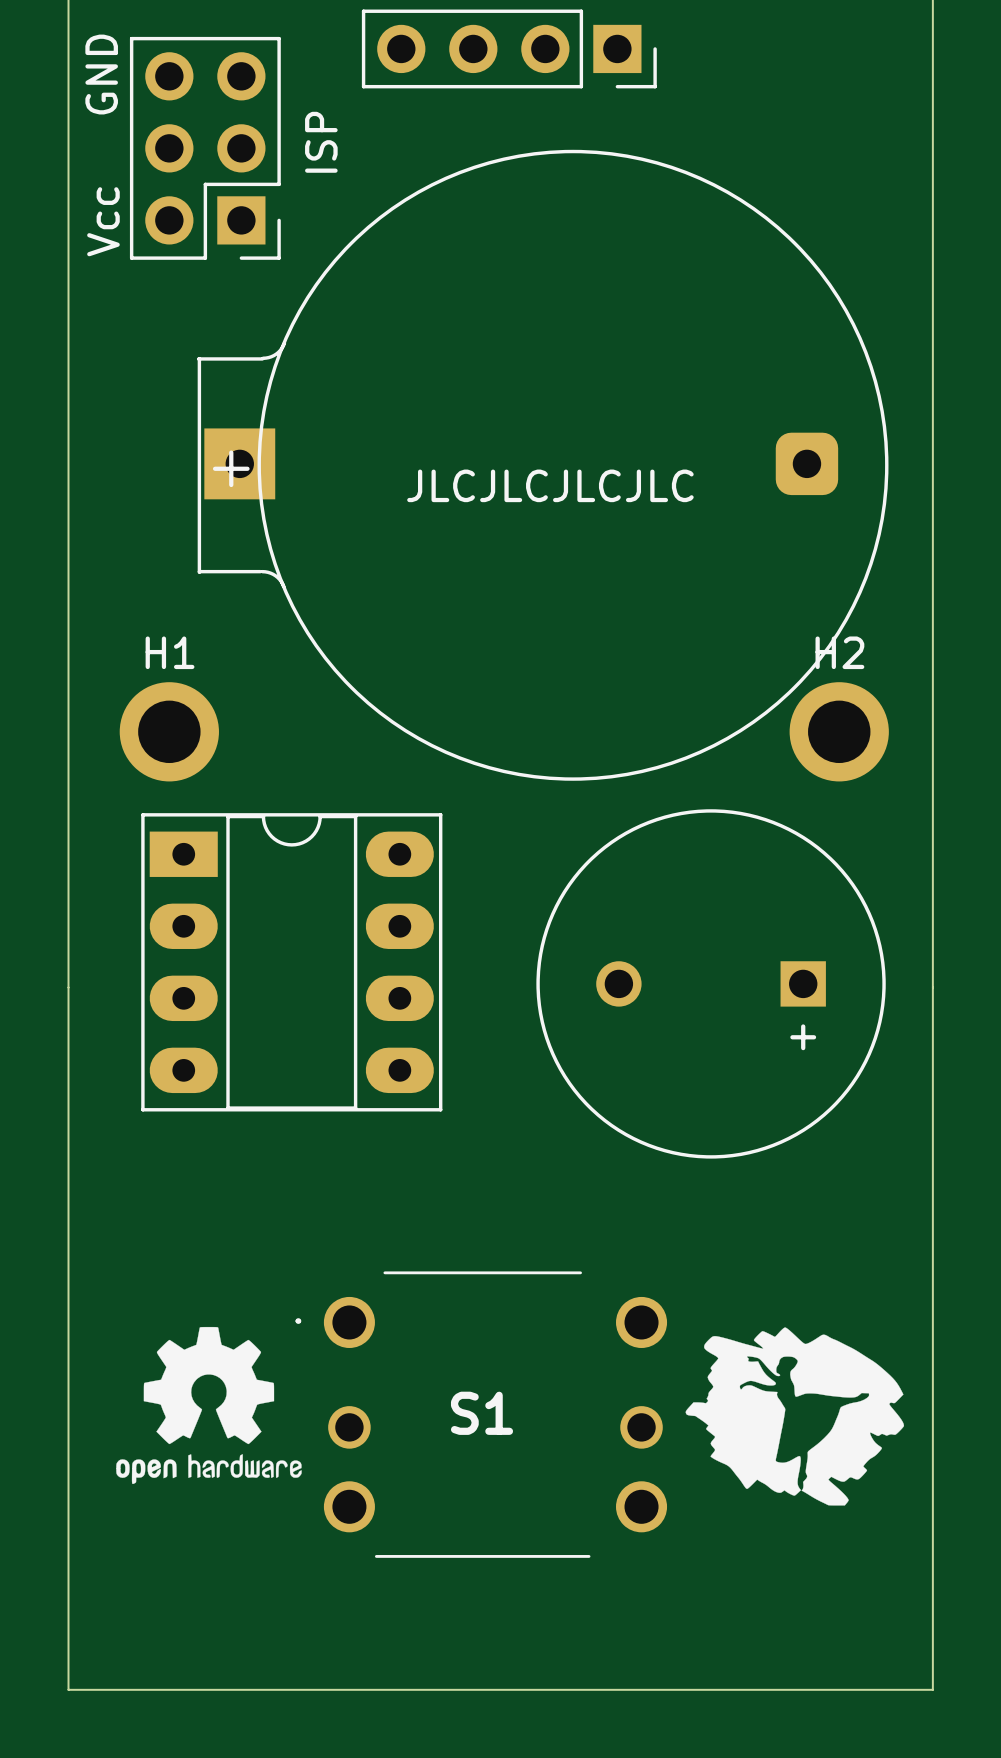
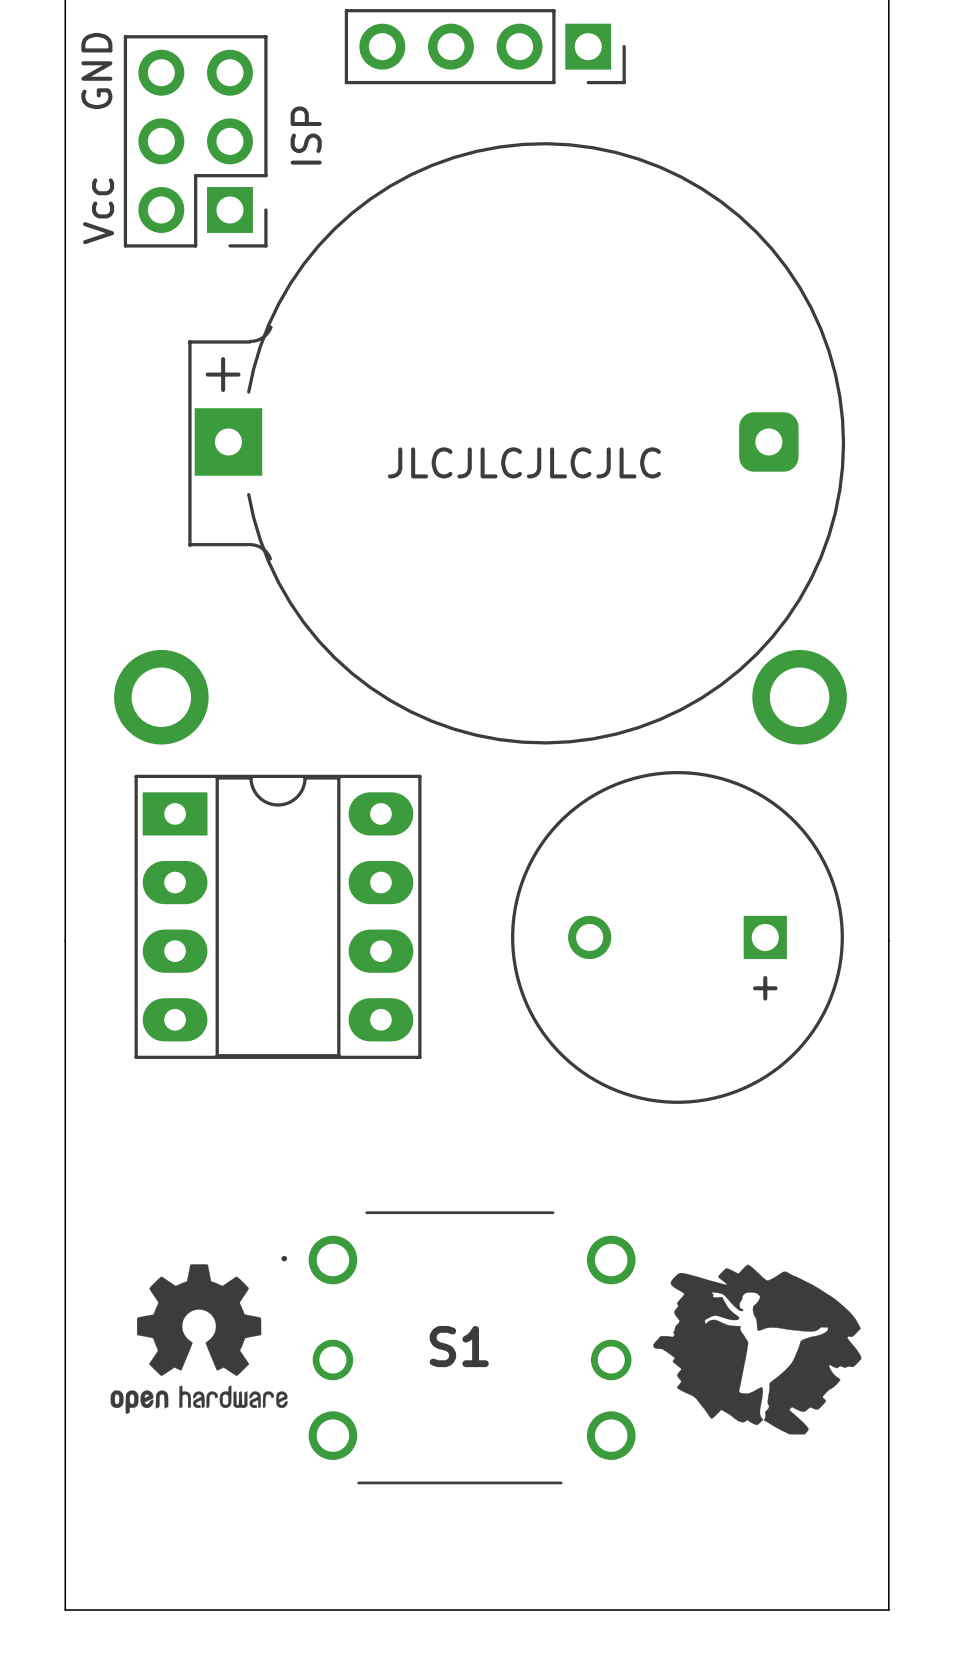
part footprint: [196, 149, 889, 781] -> [187, 142, 846, 745]
H1 name: H1 (170, 652) -> none
H2 name: H2 (839, 652) -> none

